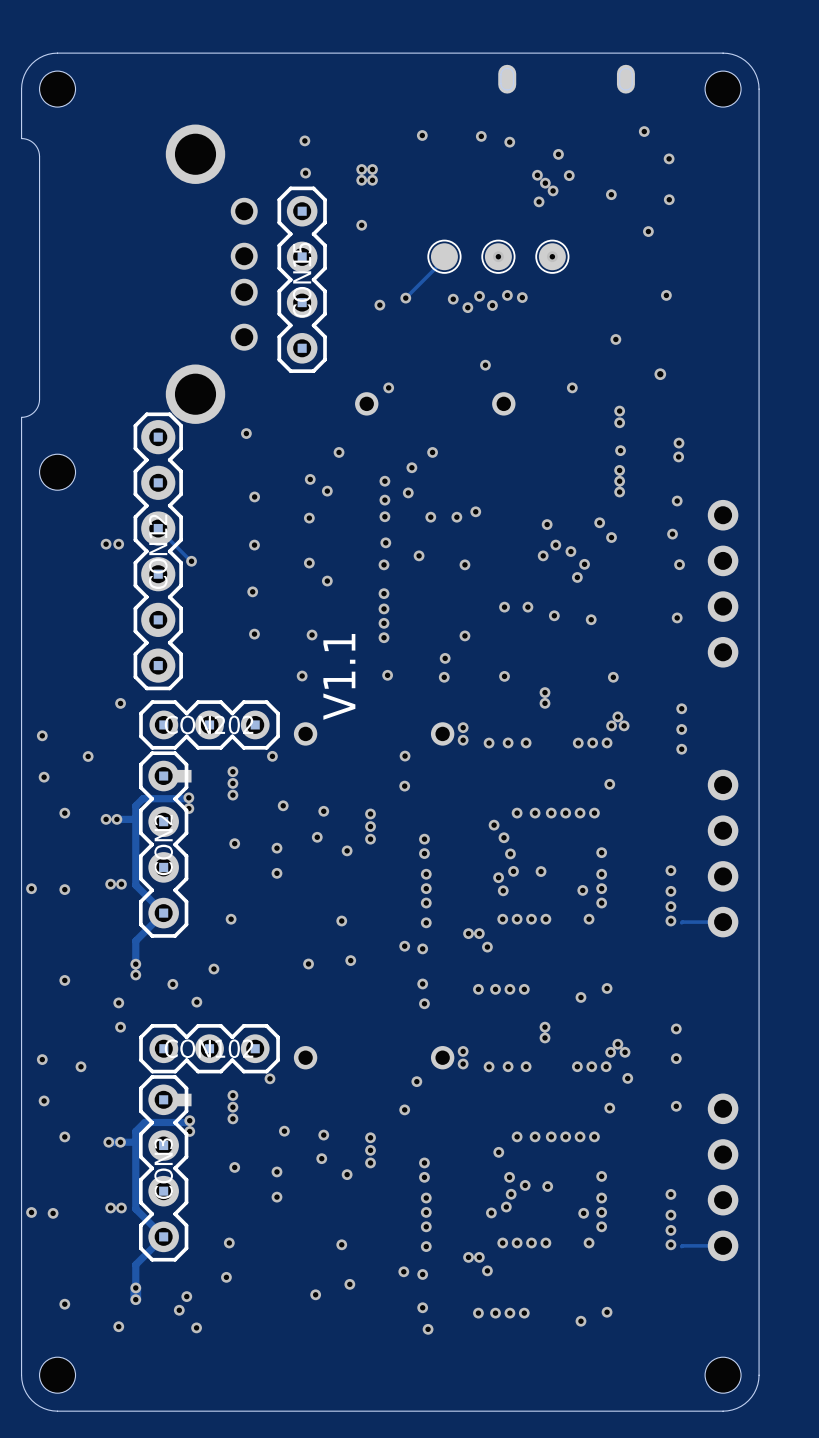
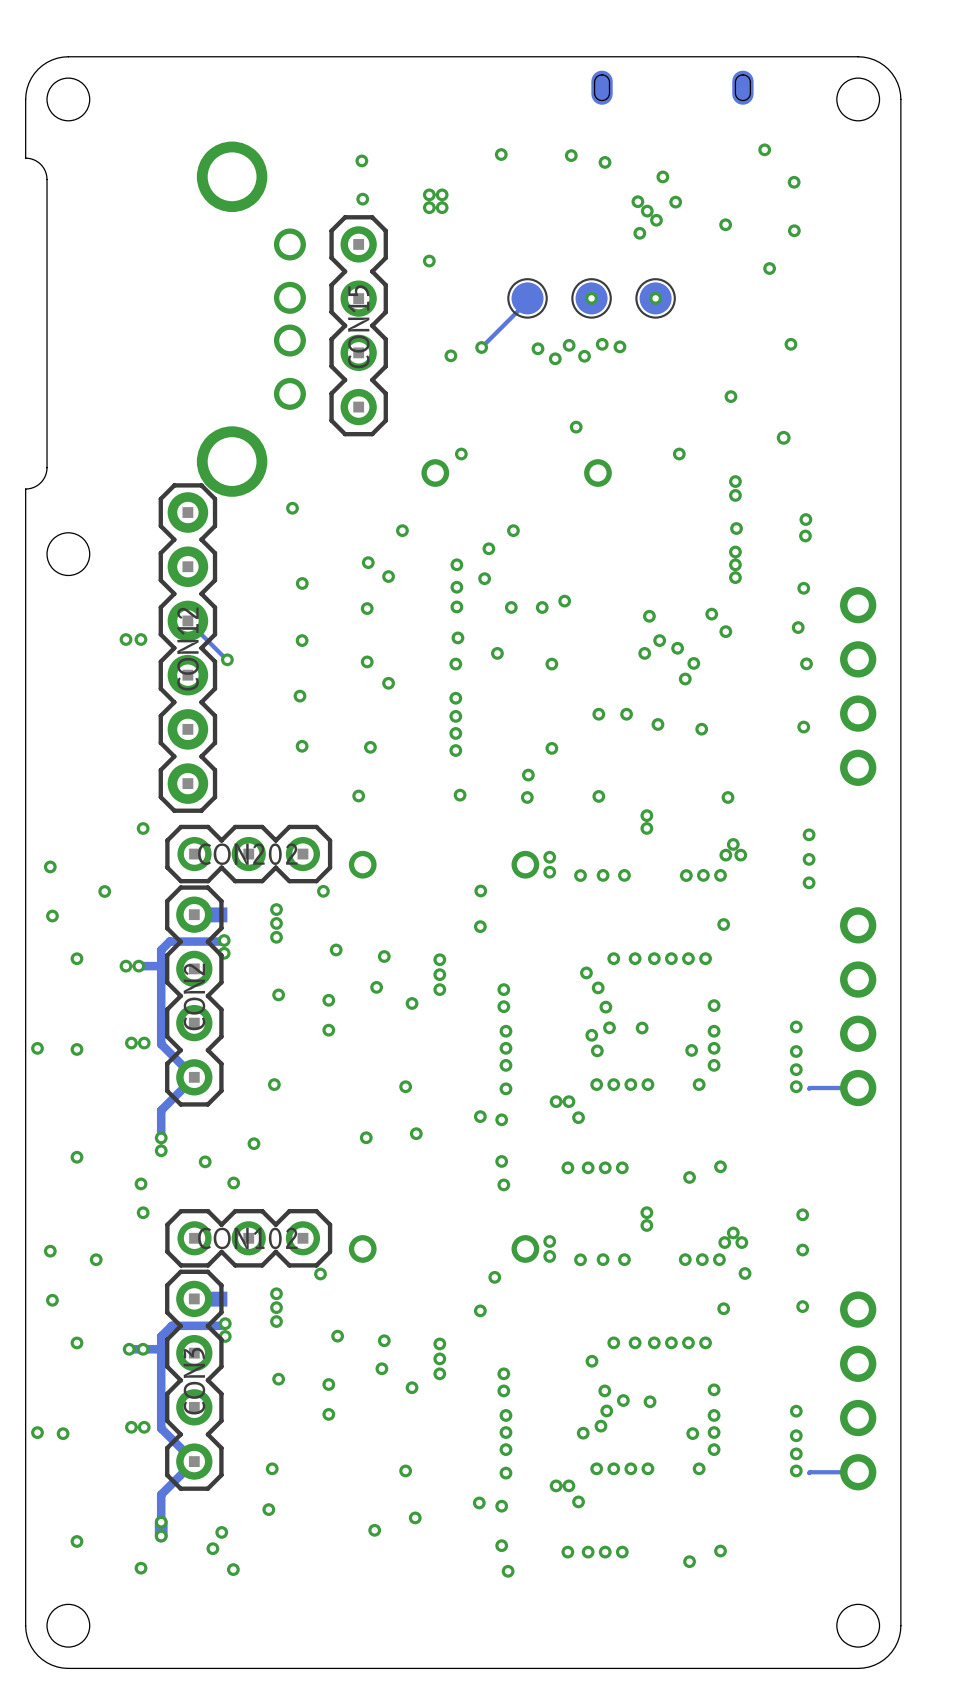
text: V1.1 (339, 676) -> none

